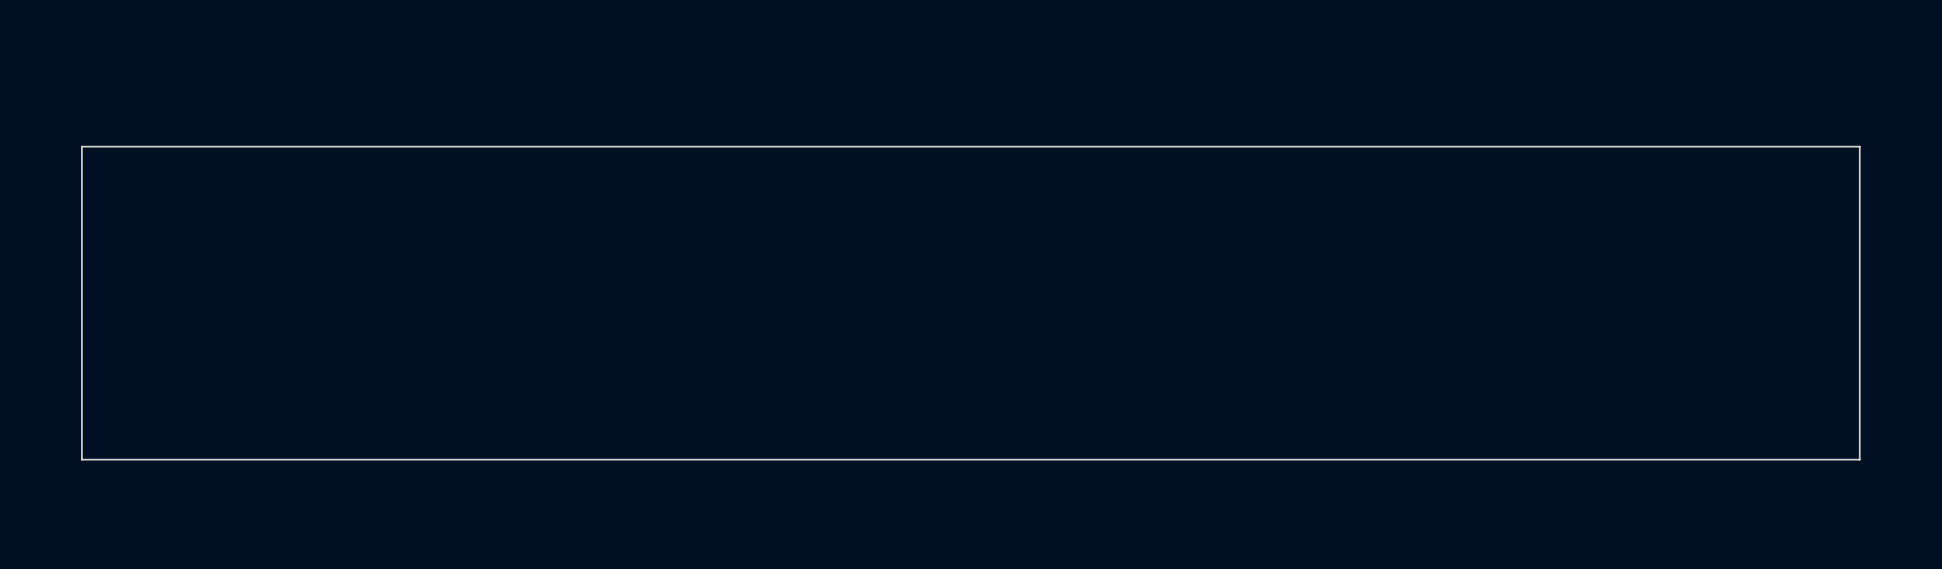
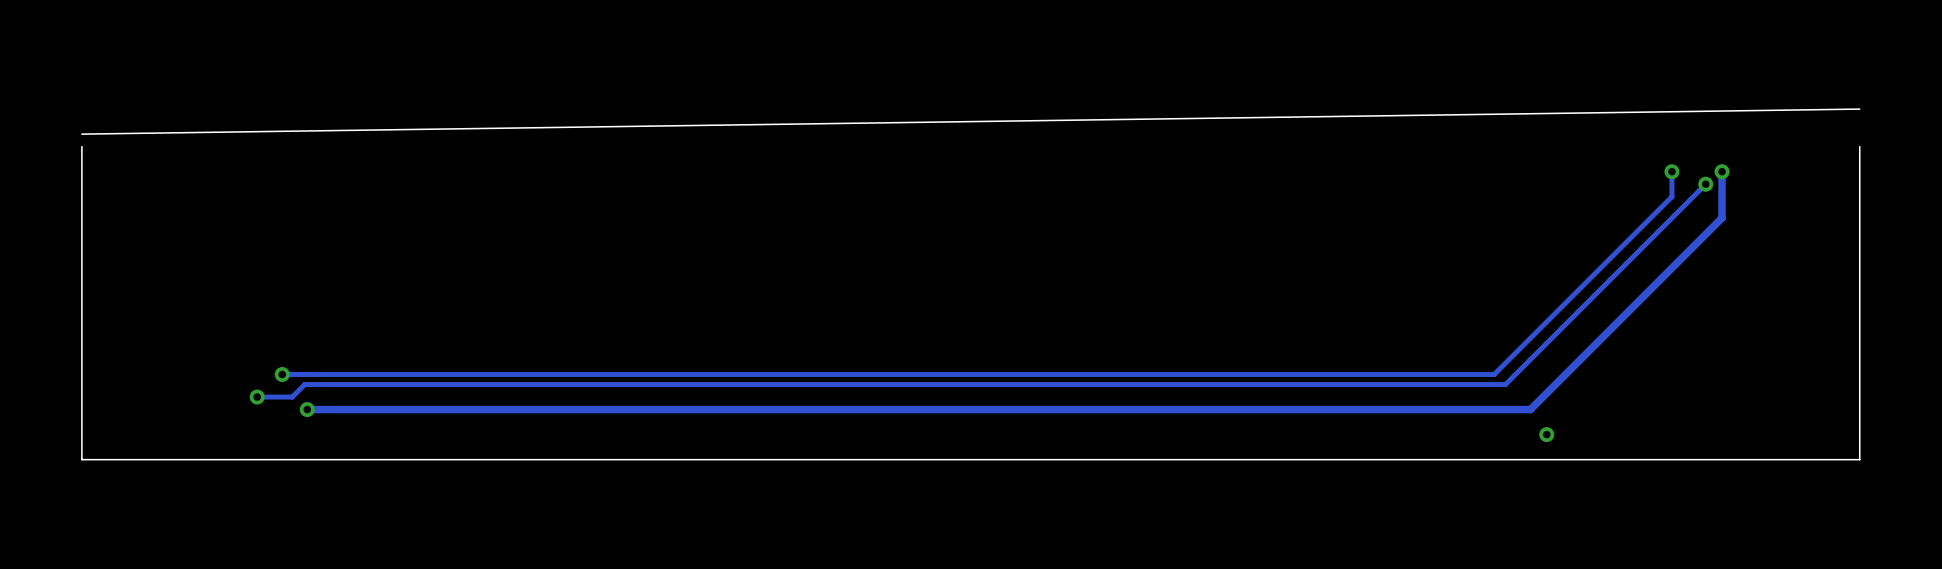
board edge: none -> (1859, 109) (81, 134)
board edge: (1859, 146) (81, 146) -> none
track: none -> (1671, 171) (1671, 196) (1494, 374) (282, 374)
via: none -> (1671, 171)
track: none -> (1722, 171) (1722, 218) (1530, 409) (307, 409)
via: none -> (1722, 171)
track: none -> (1705, 184) (1505, 384) (304, 384) (292, 397) (257, 397)
via: none -> (1705, 184)
via: none -> (282, 374)
via: none -> (257, 397)
via: none -> (307, 409)
via: none -> (1546, 434)

